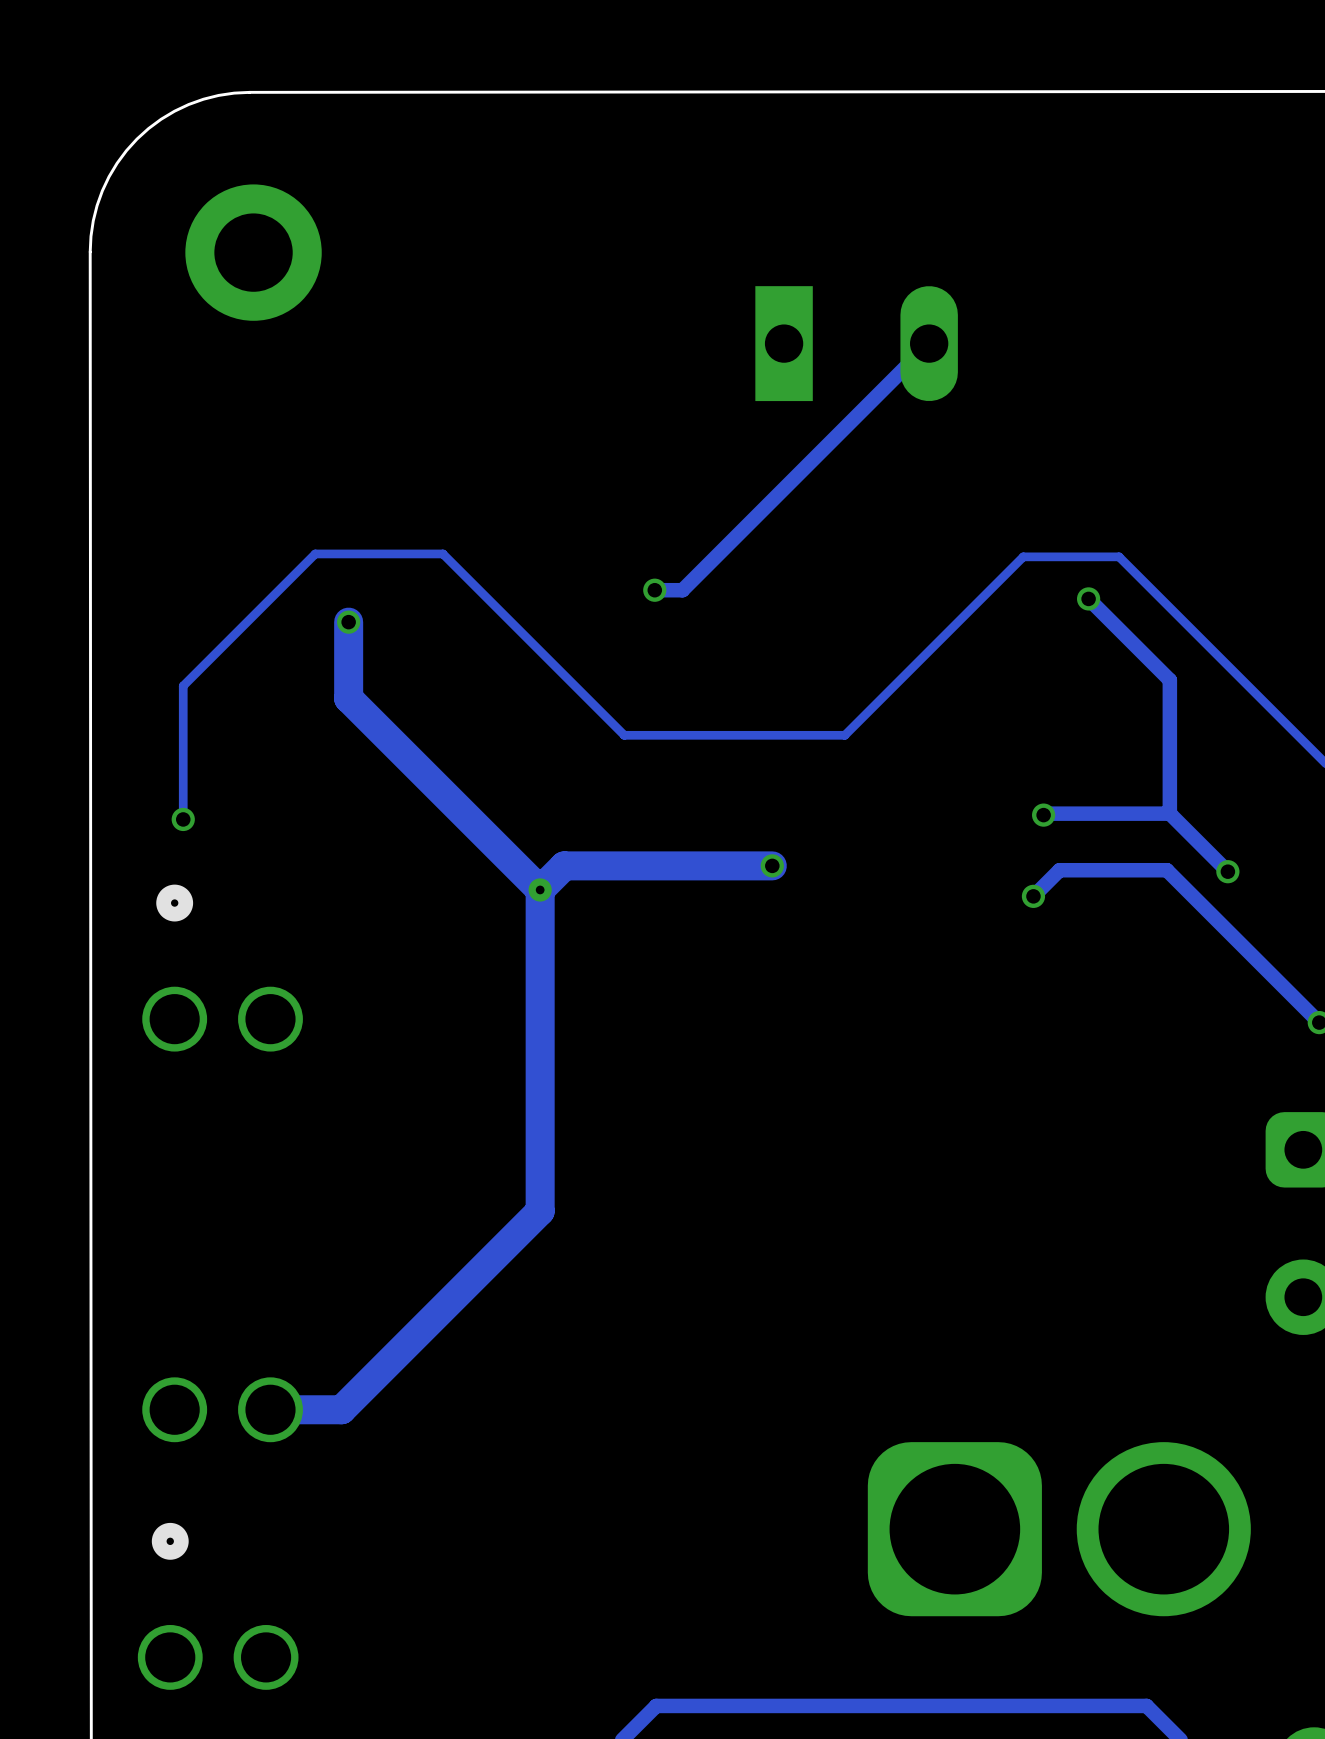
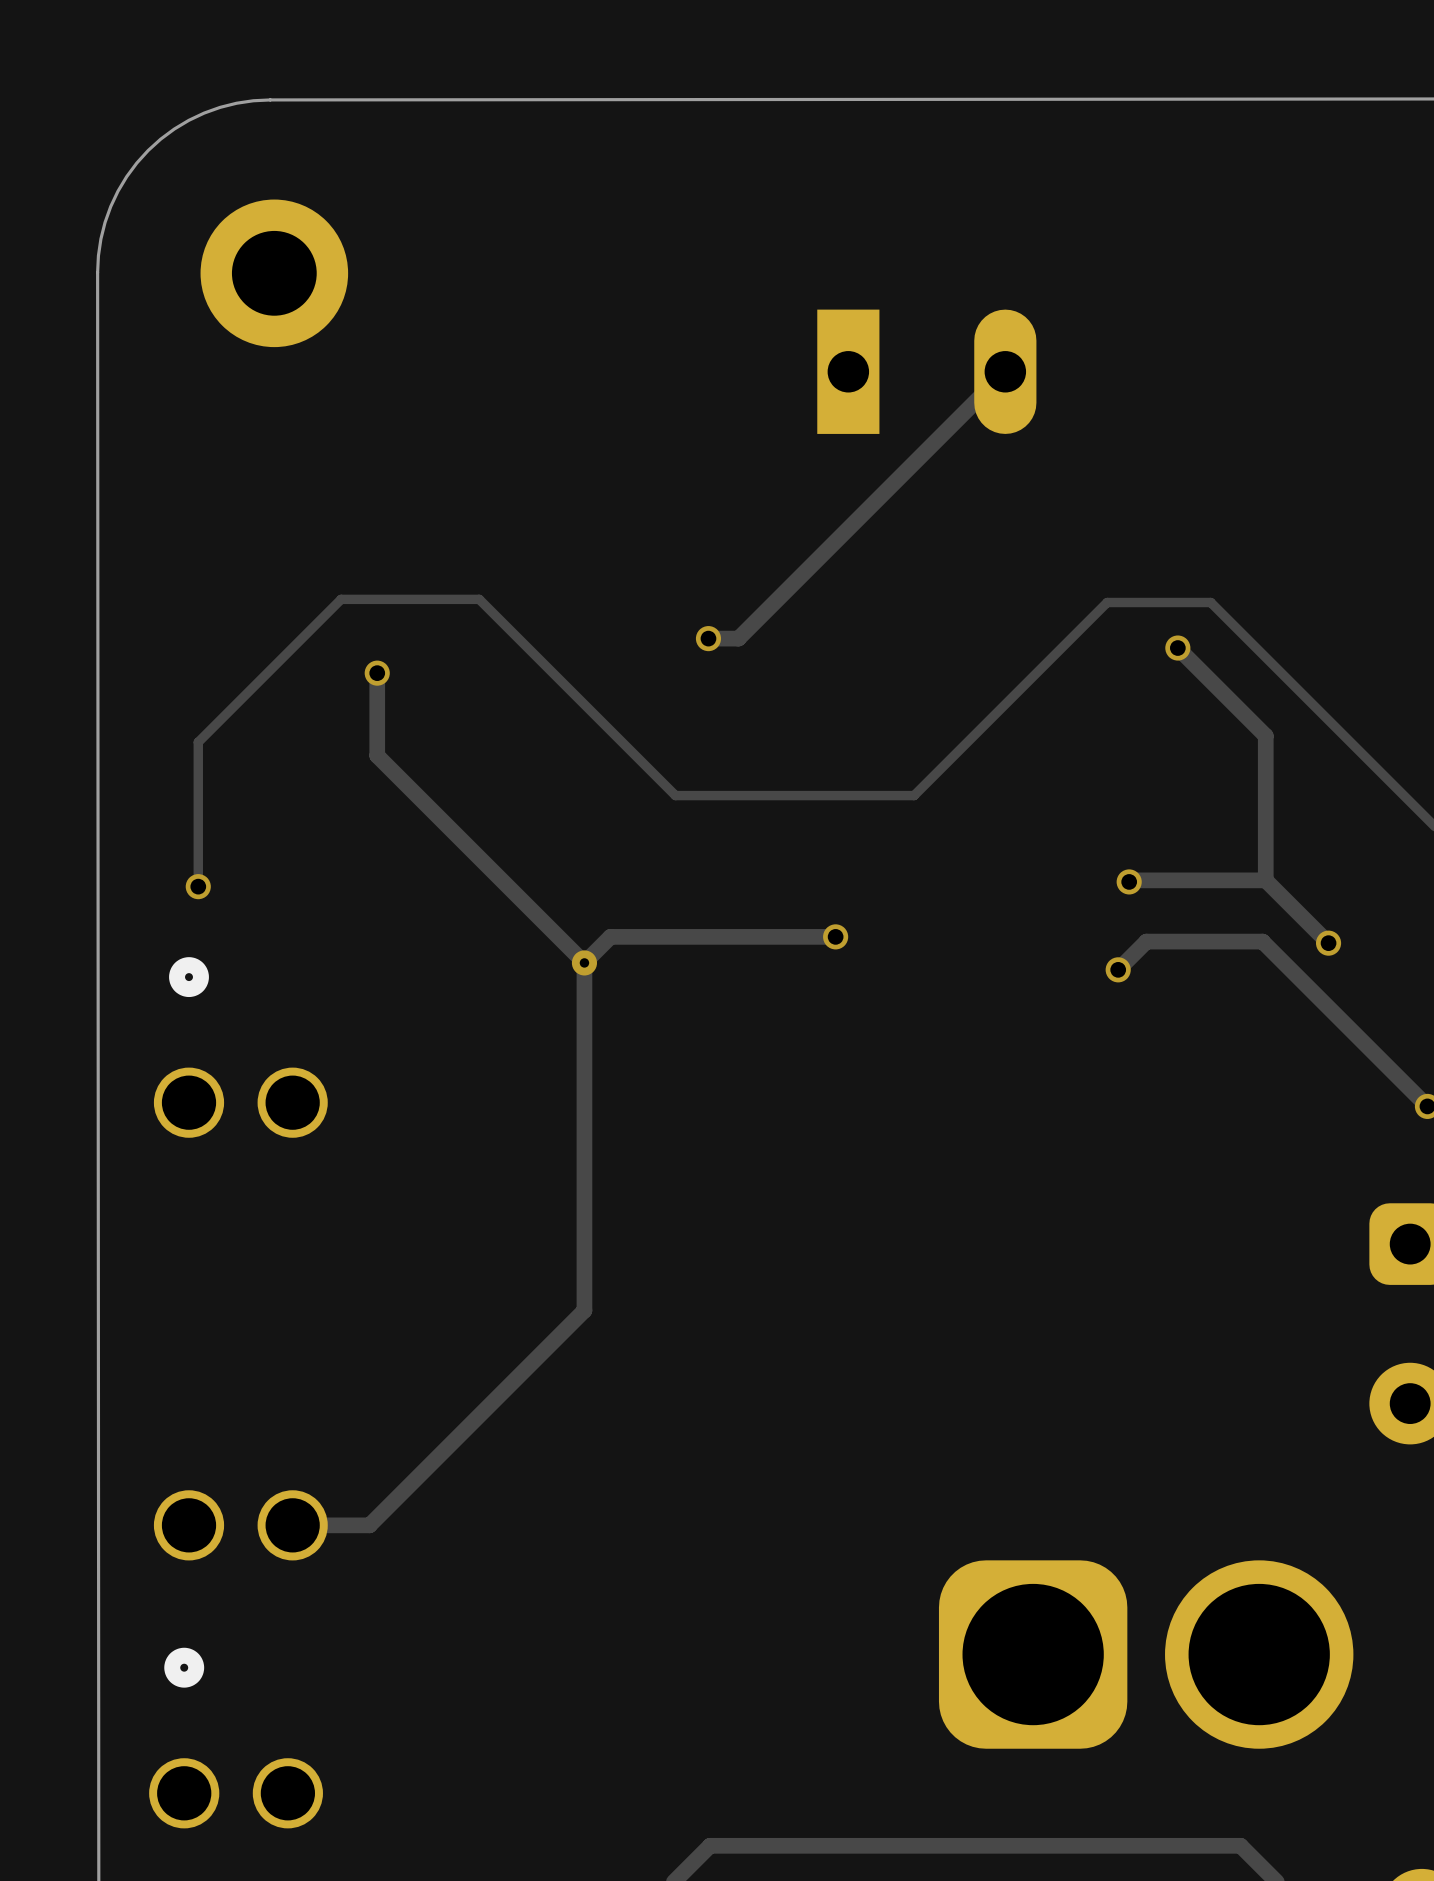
track width: thick (348, 622) (348, 698) (540, 889) -> thin (377, 673) (377, 755) (584, 962)
track width: thick (772, 865) (564, 865) (540, 889) -> thin (835, 936) (610, 936) (584, 962)
track width: thick (540, 889) (540, 1211) (341, 1409) (270, 1409) -> thin (584, 962) (584, 1310) (369, 1525) (292, 1525)

